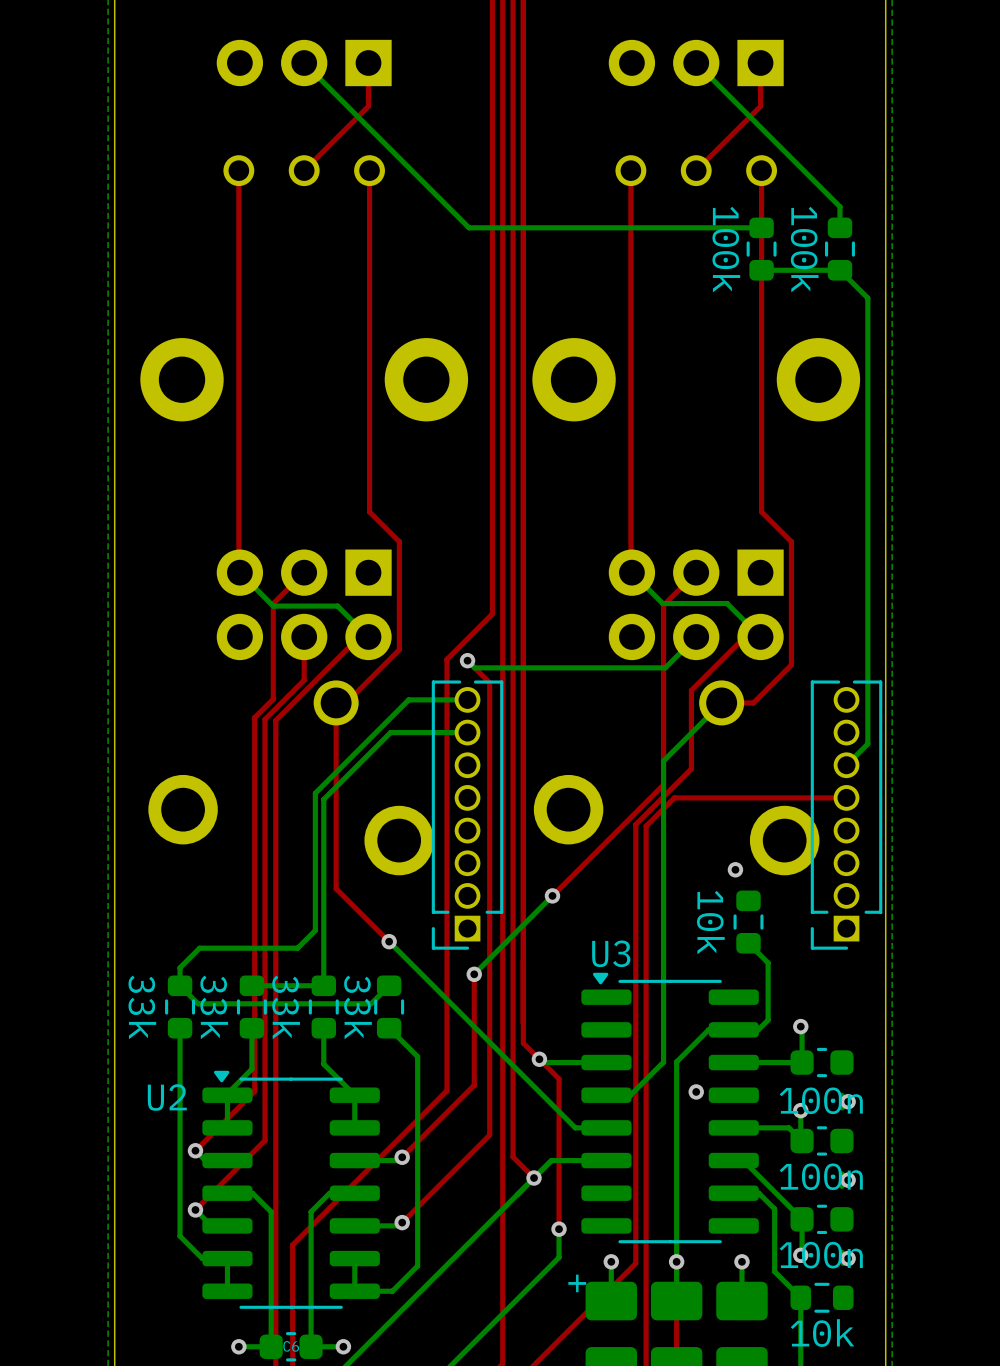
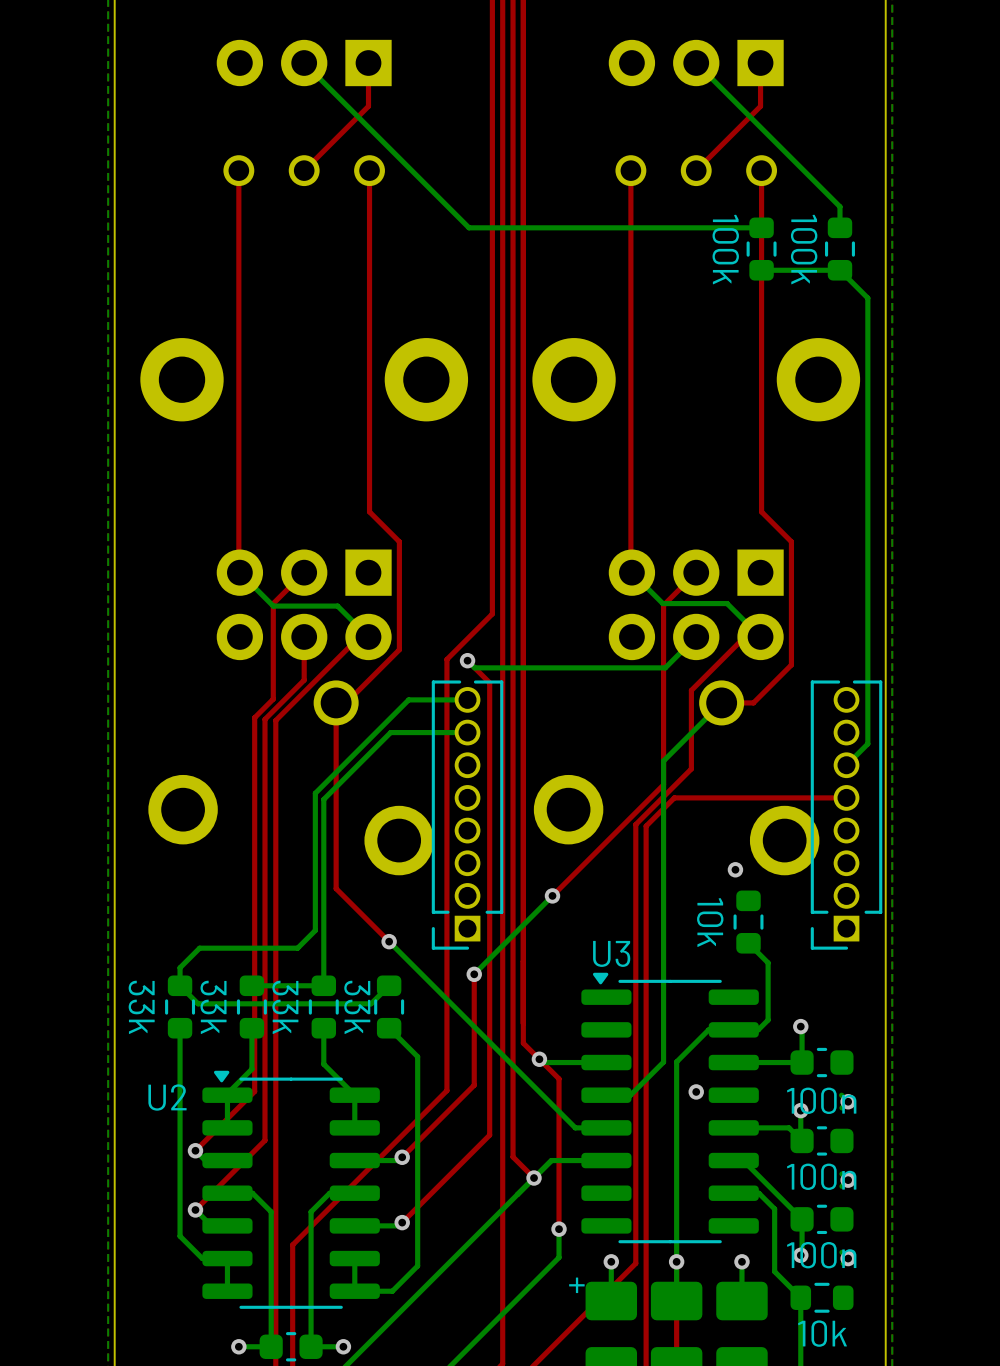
C6 name: C6 (291, 1346) -> none

